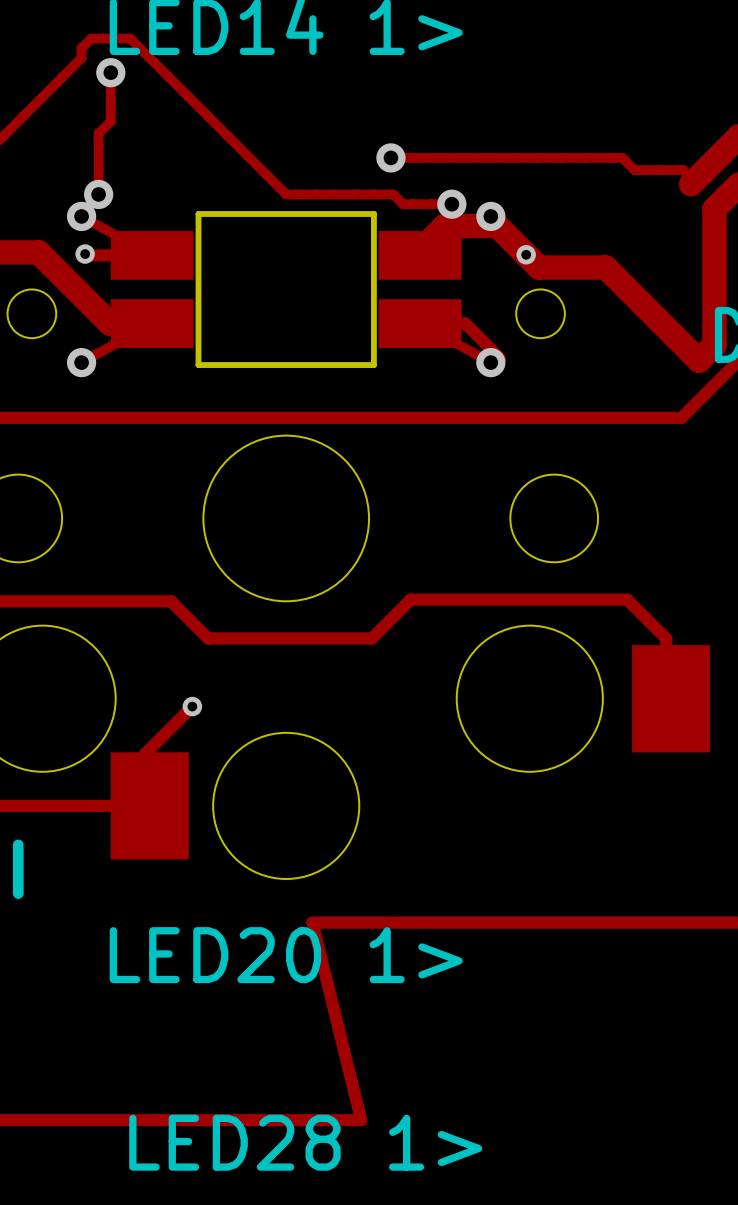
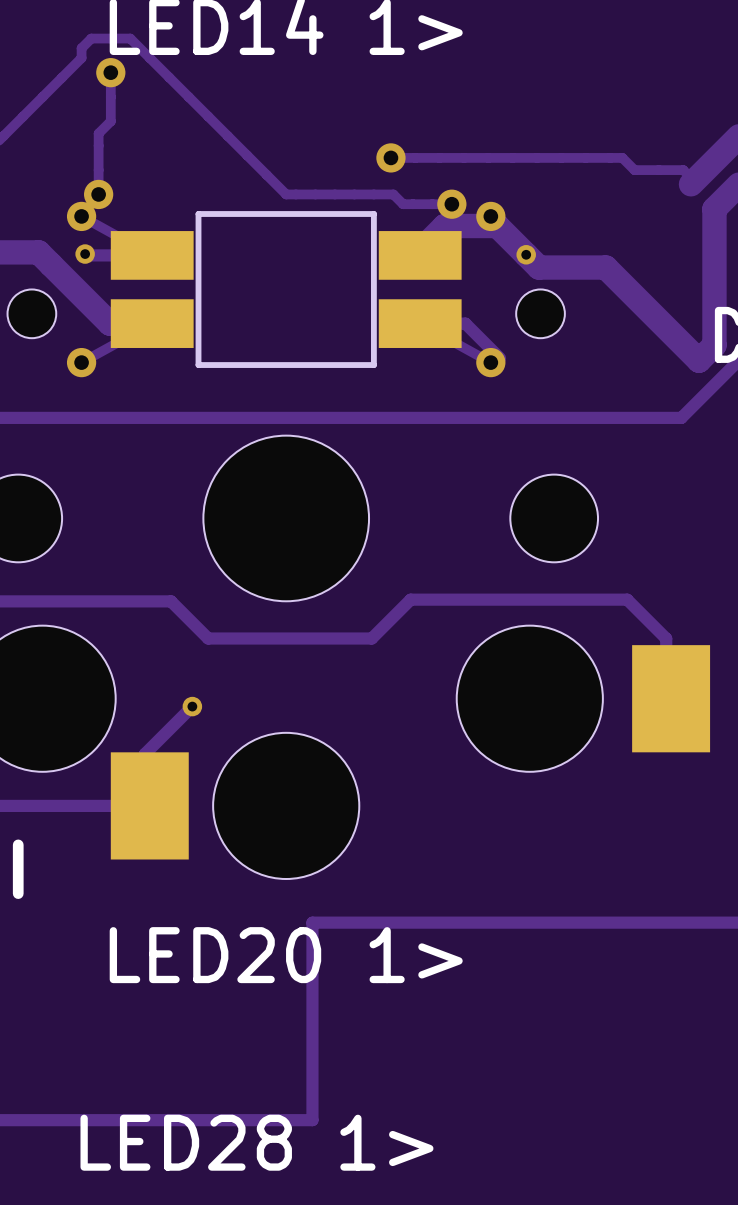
track: (312, 922) (361, 1120) (312, 1120) -> (312, 922) (312, 1120)
text position: LED28 1> (305, 1142) -> LED28 1> (256, 1142)

